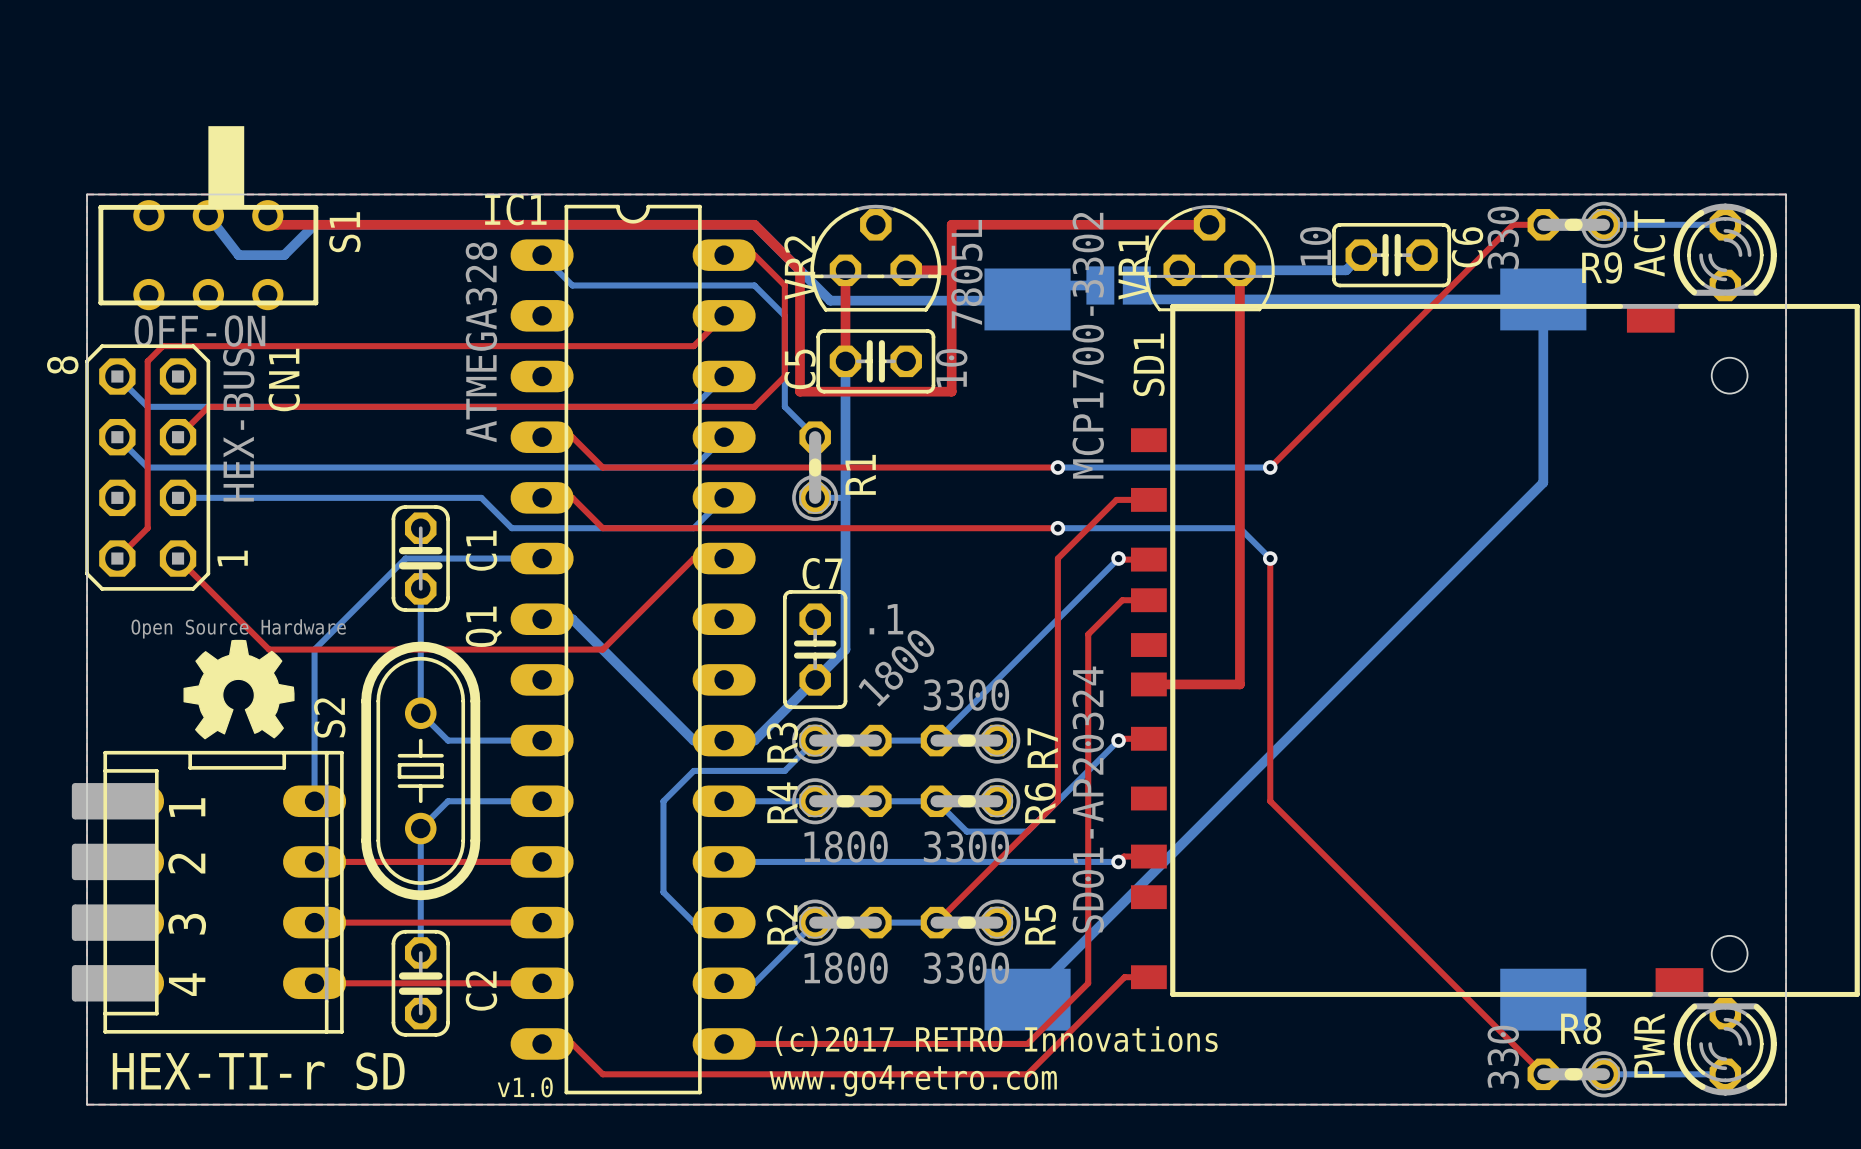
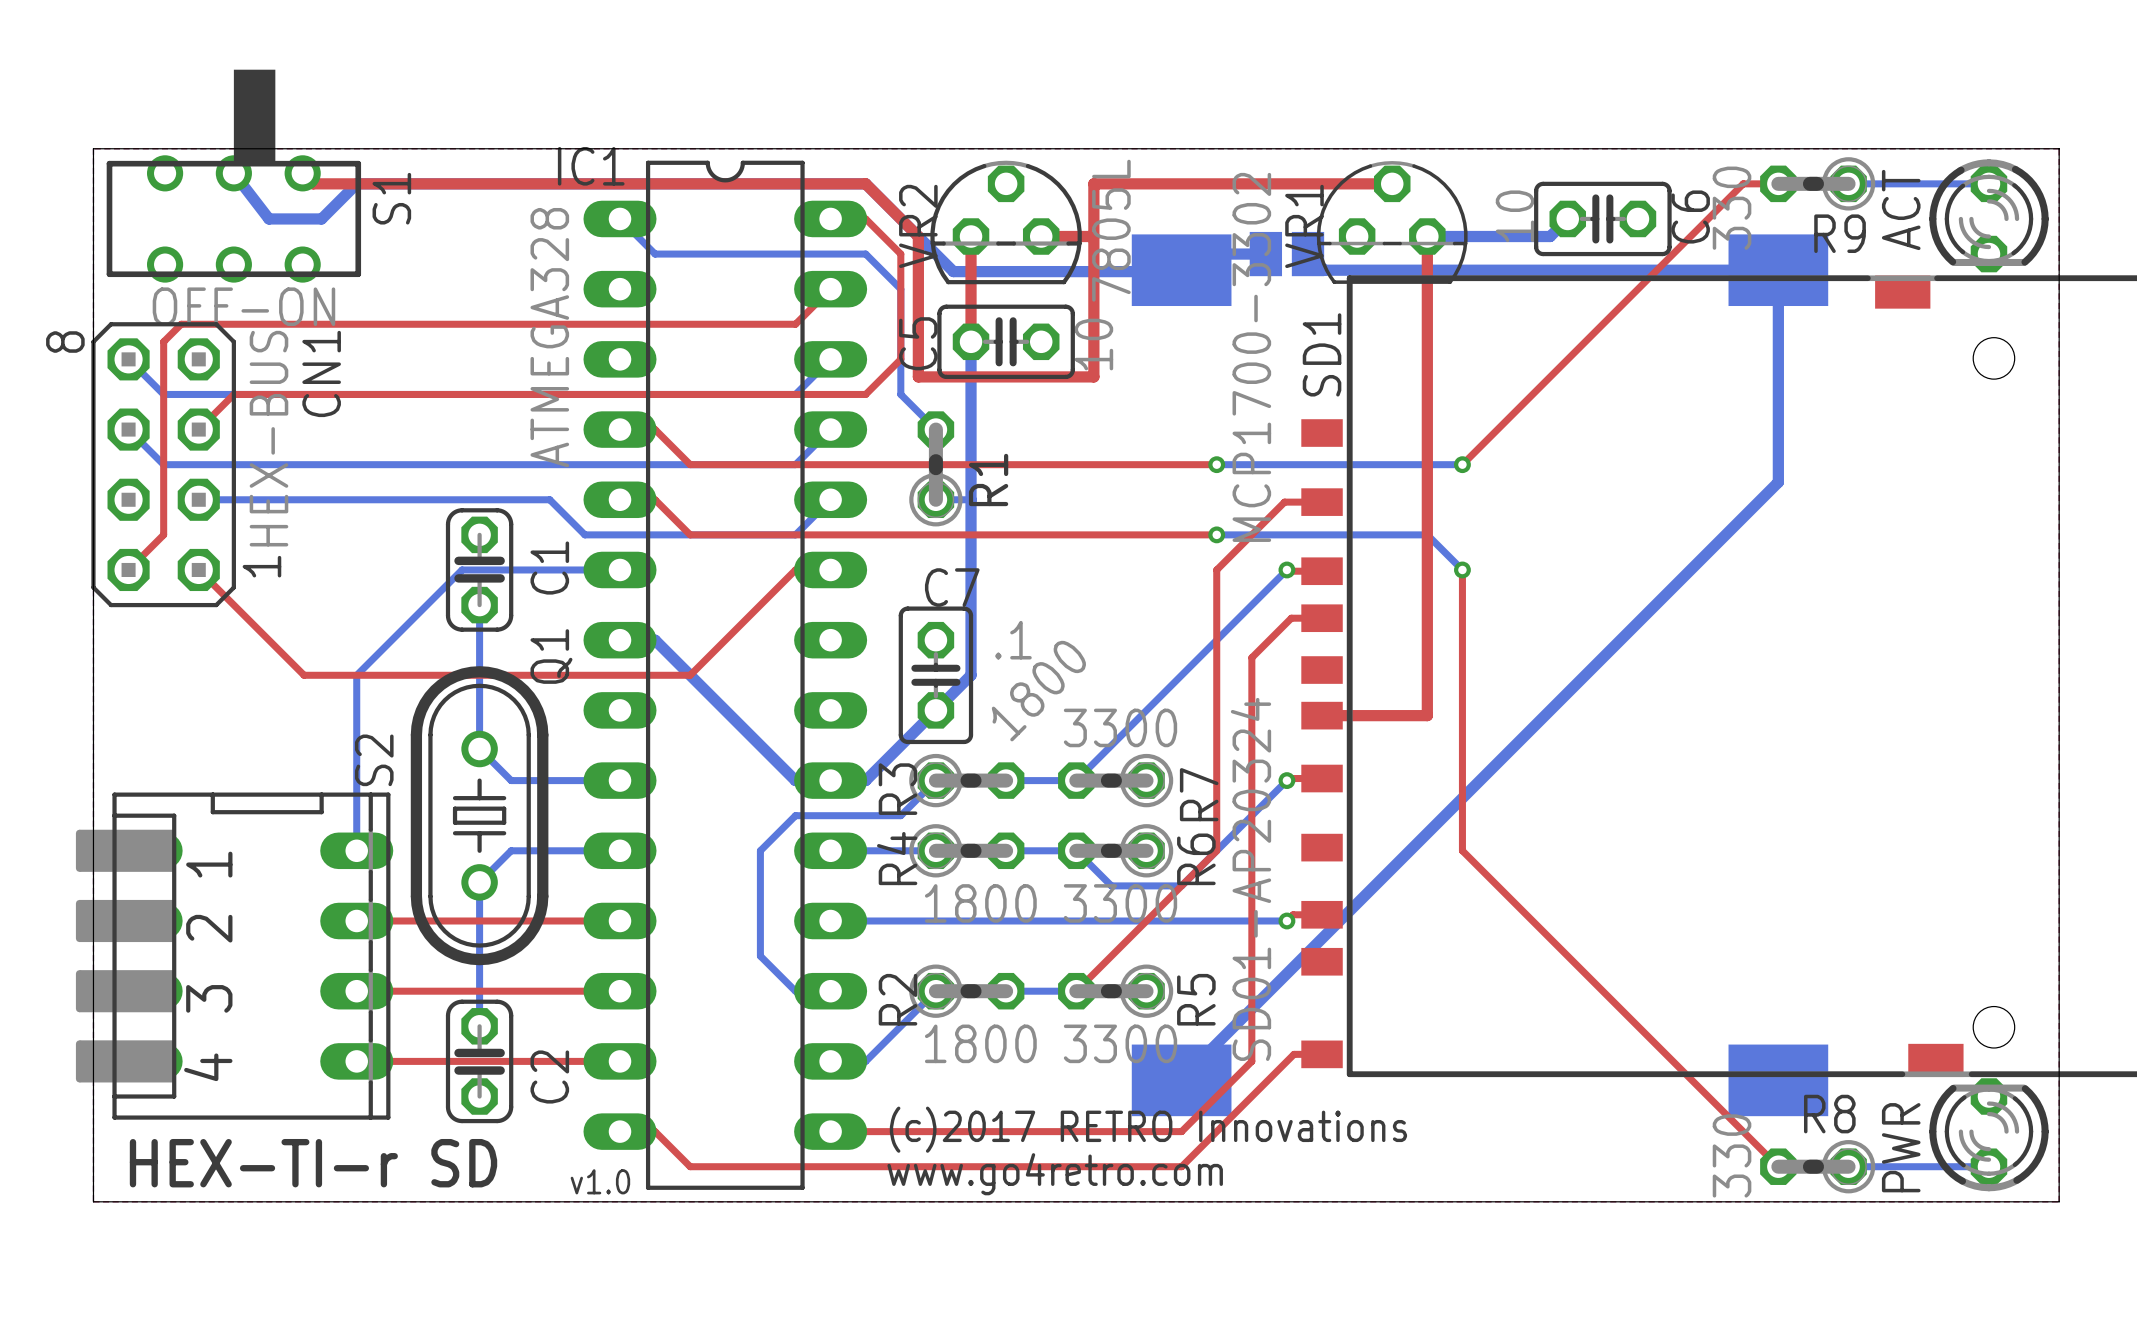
drawing: [183, 639, 295, 740] -> none

